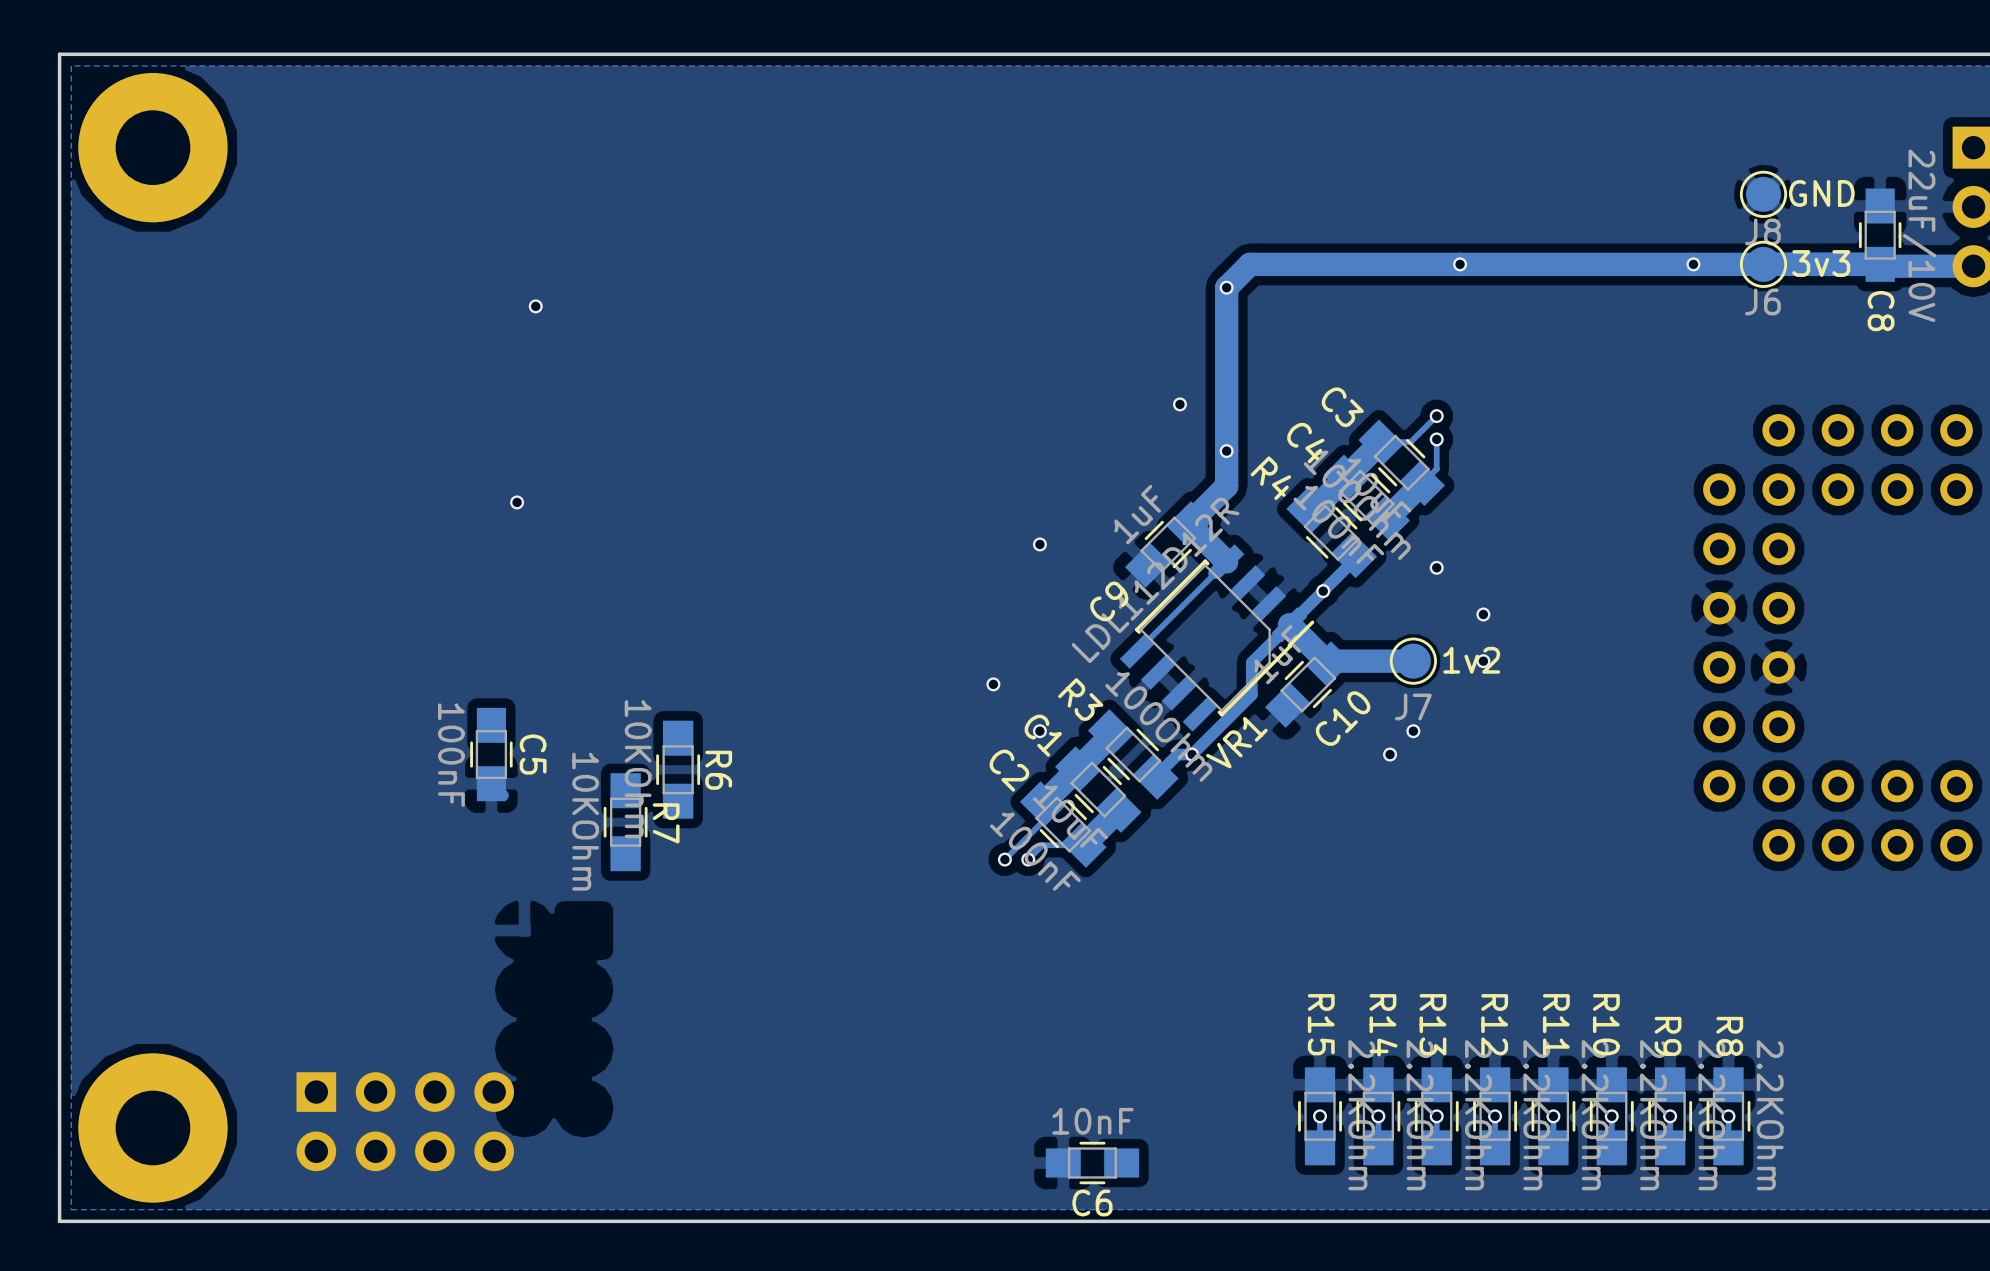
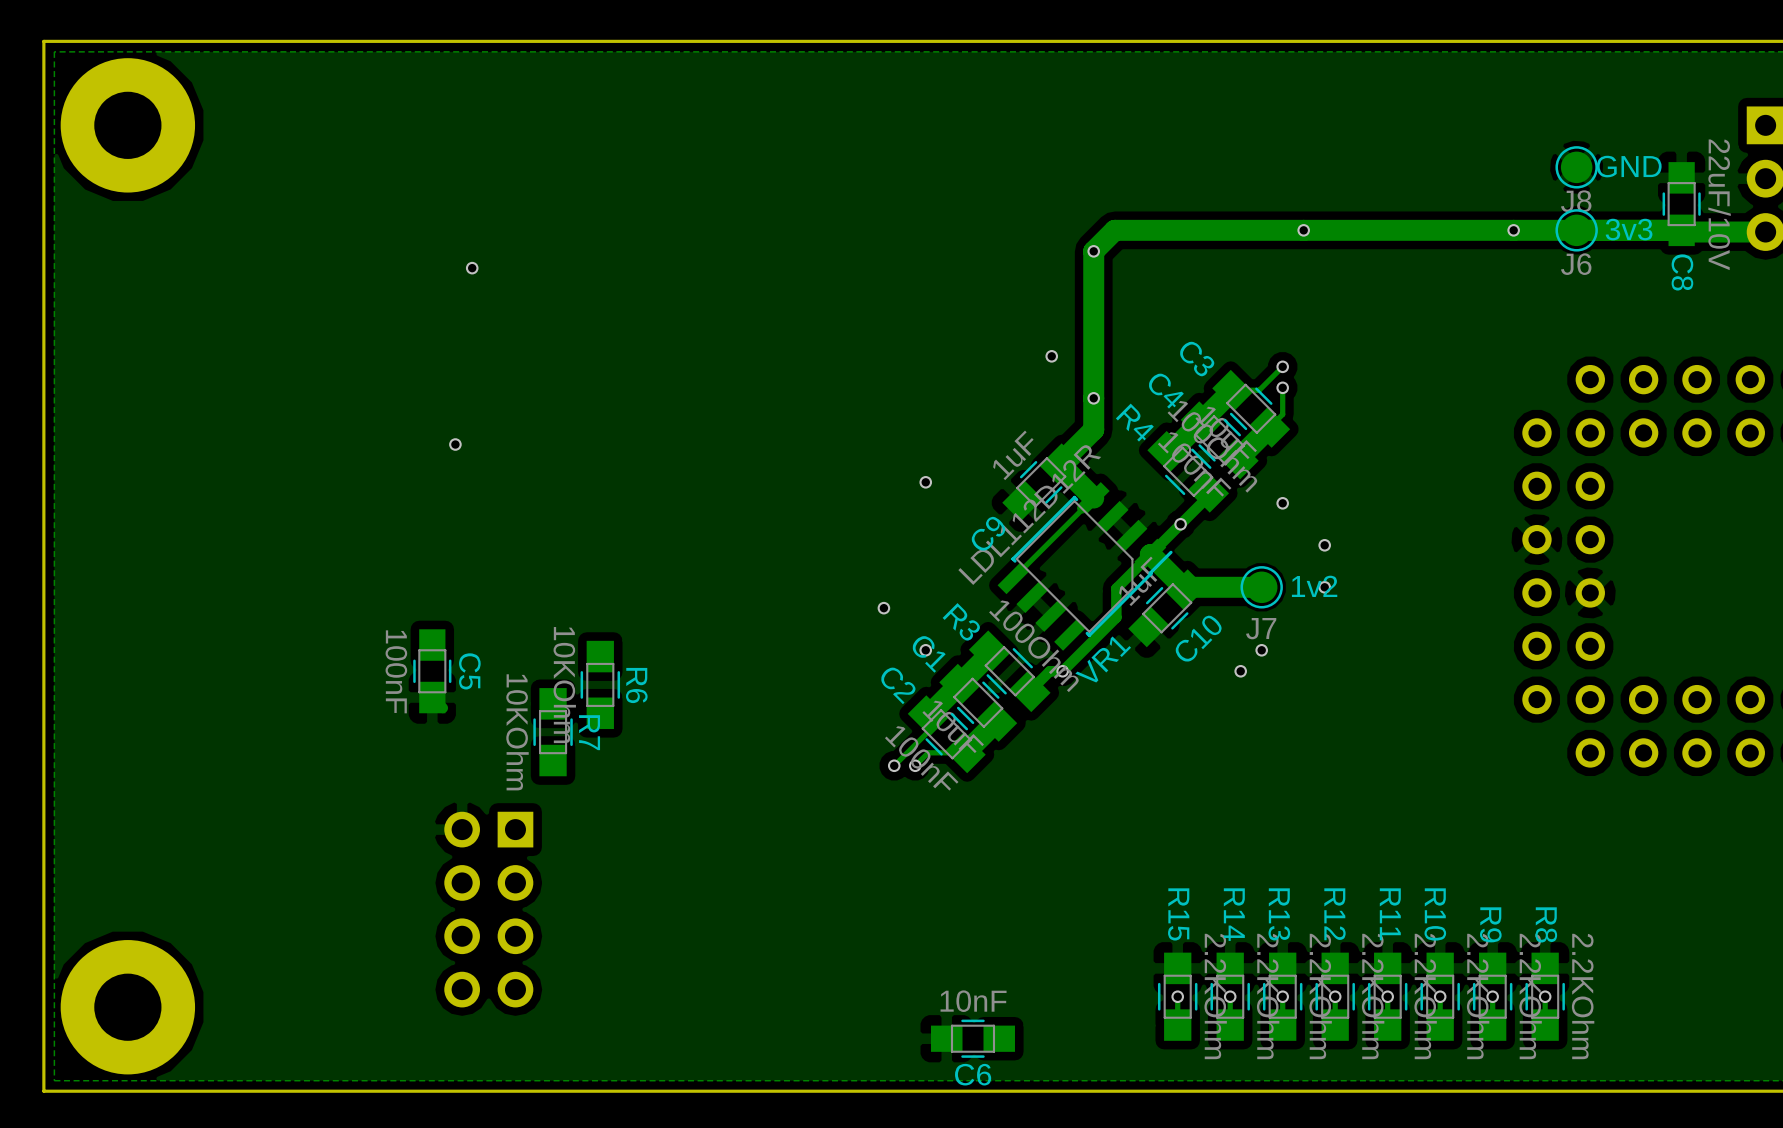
part rotation: 0° (405, 1121) -> 90° clockwise (488, 909)
part position: (405, 1121) -> (488, 909)

